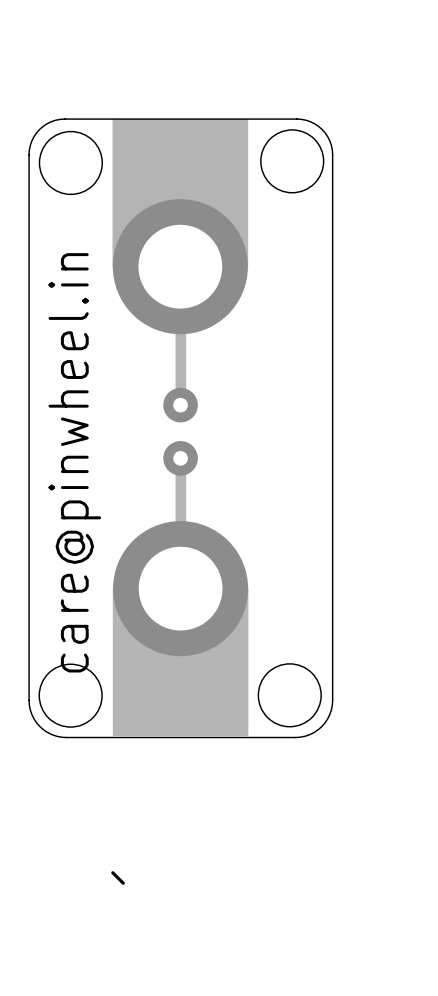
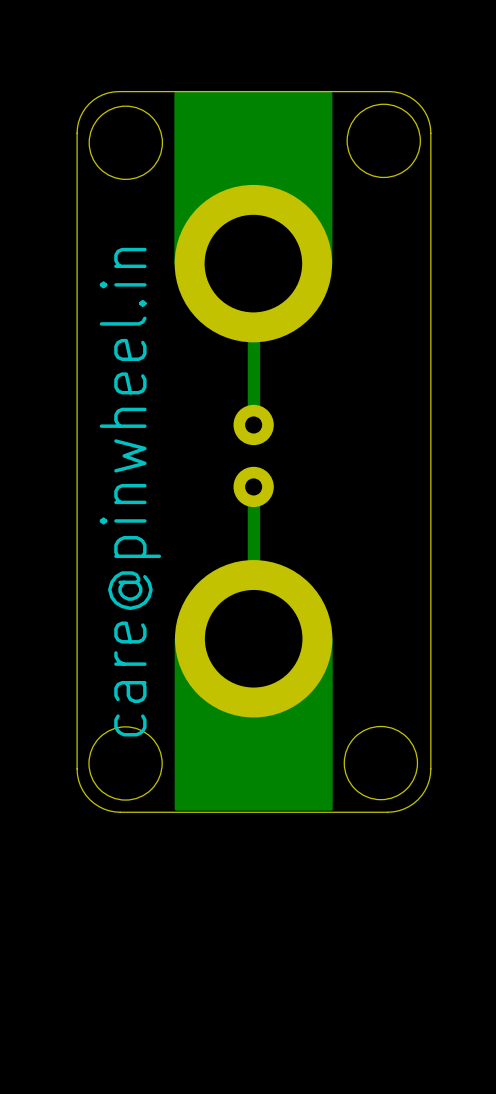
board edge: (112, 872) (123, 883) -> none

